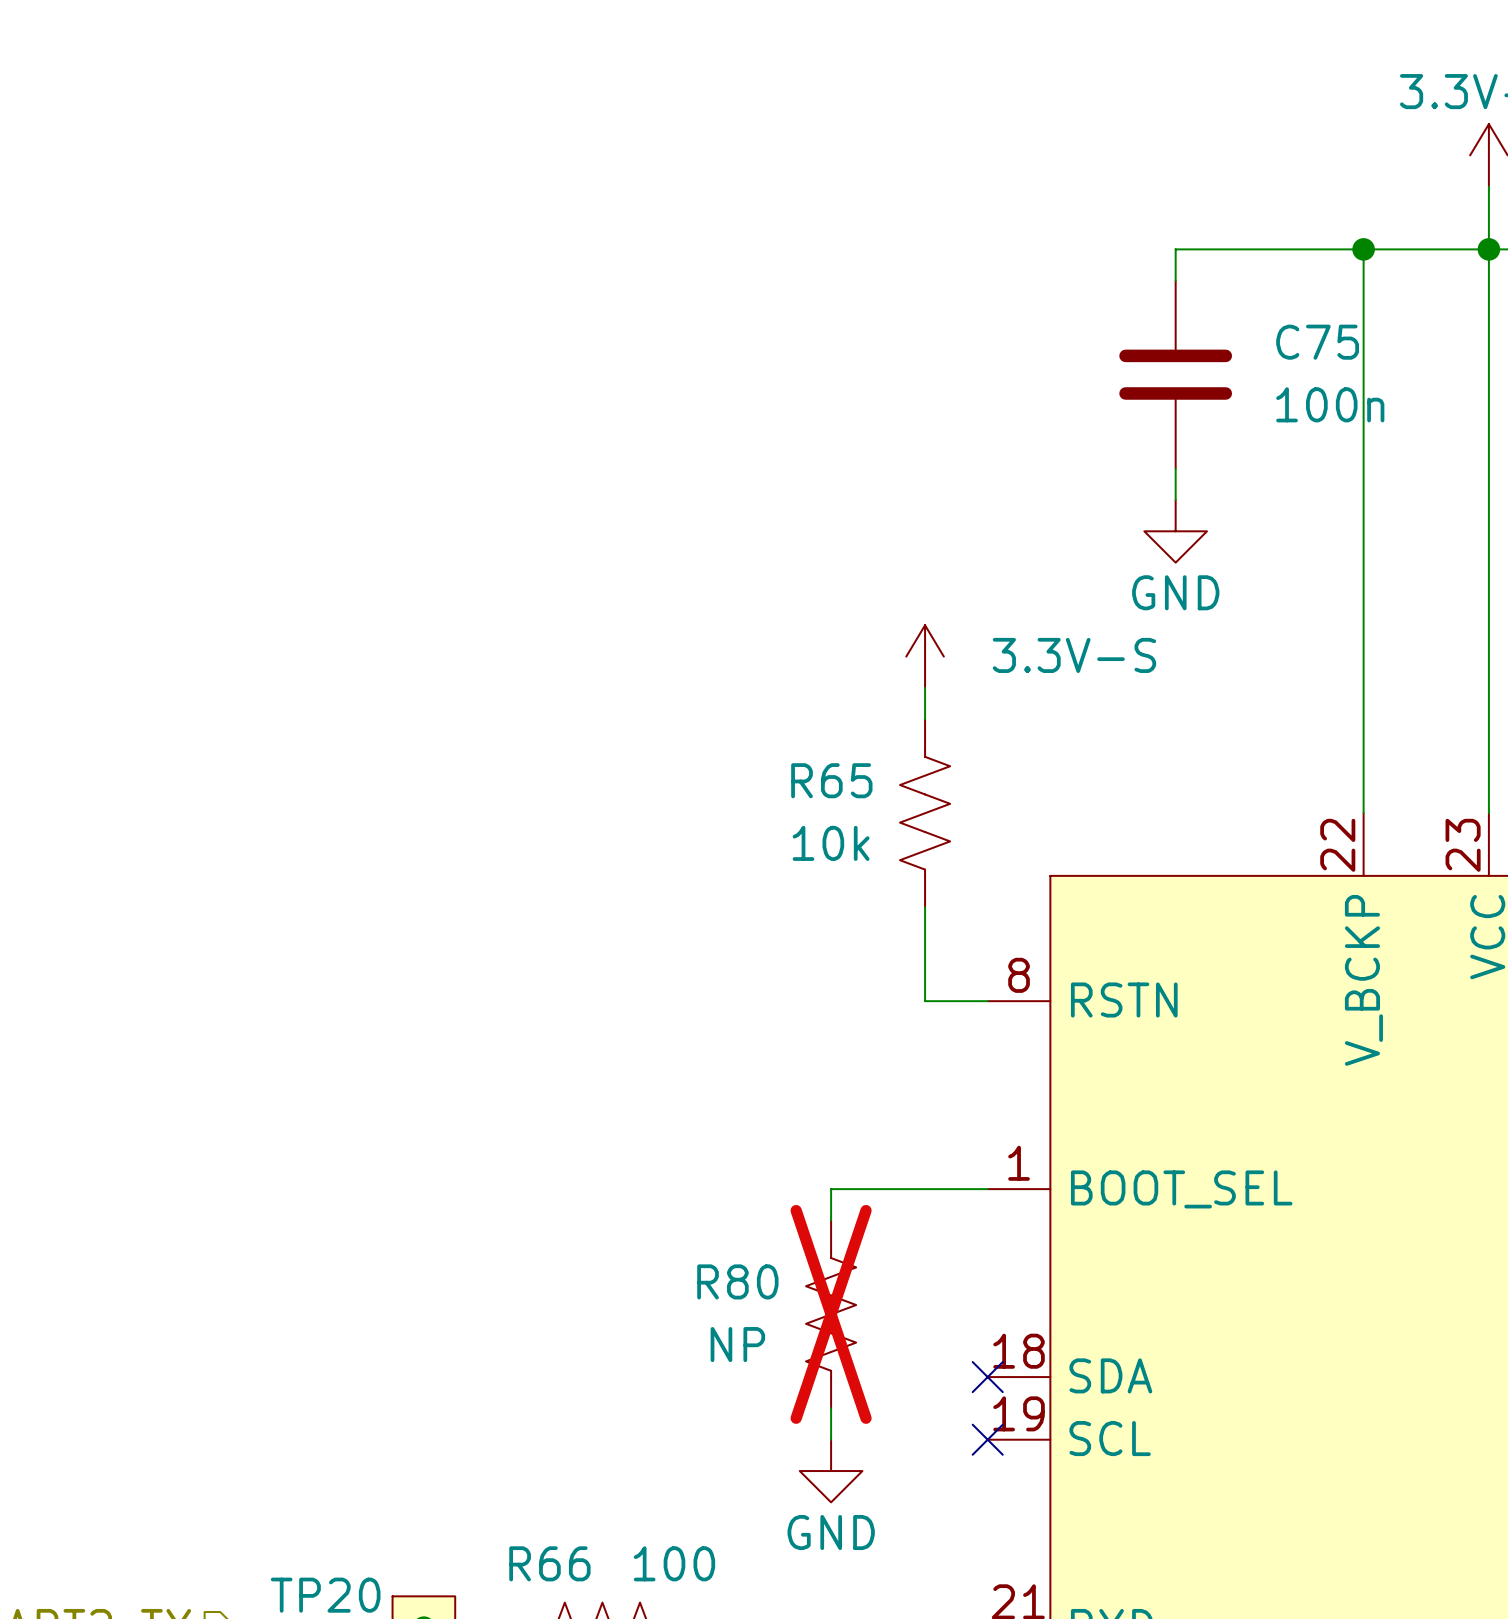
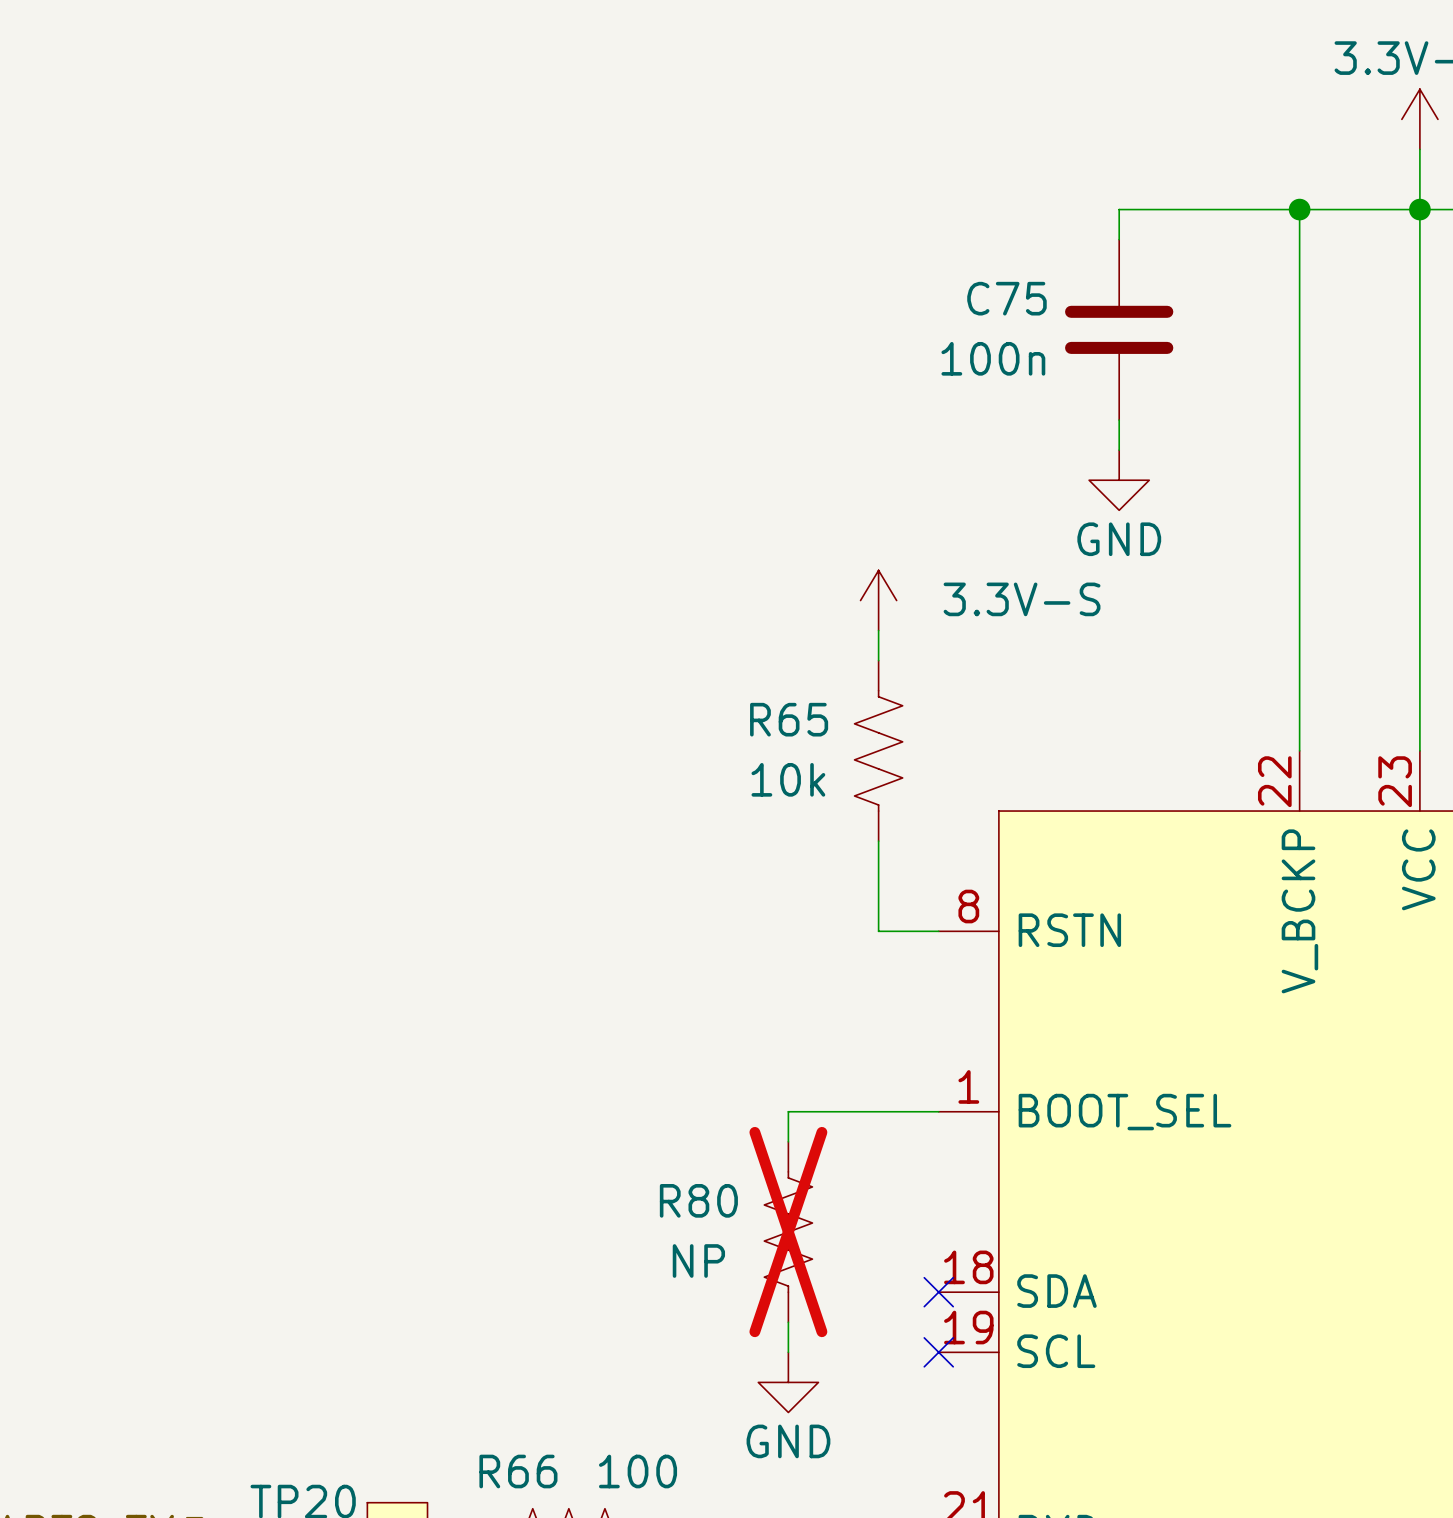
C75 name position: C75 (1317, 342) -> C75 (1006, 298)
C75 value position: 100n (1330, 404) -> 100n (993, 358)

